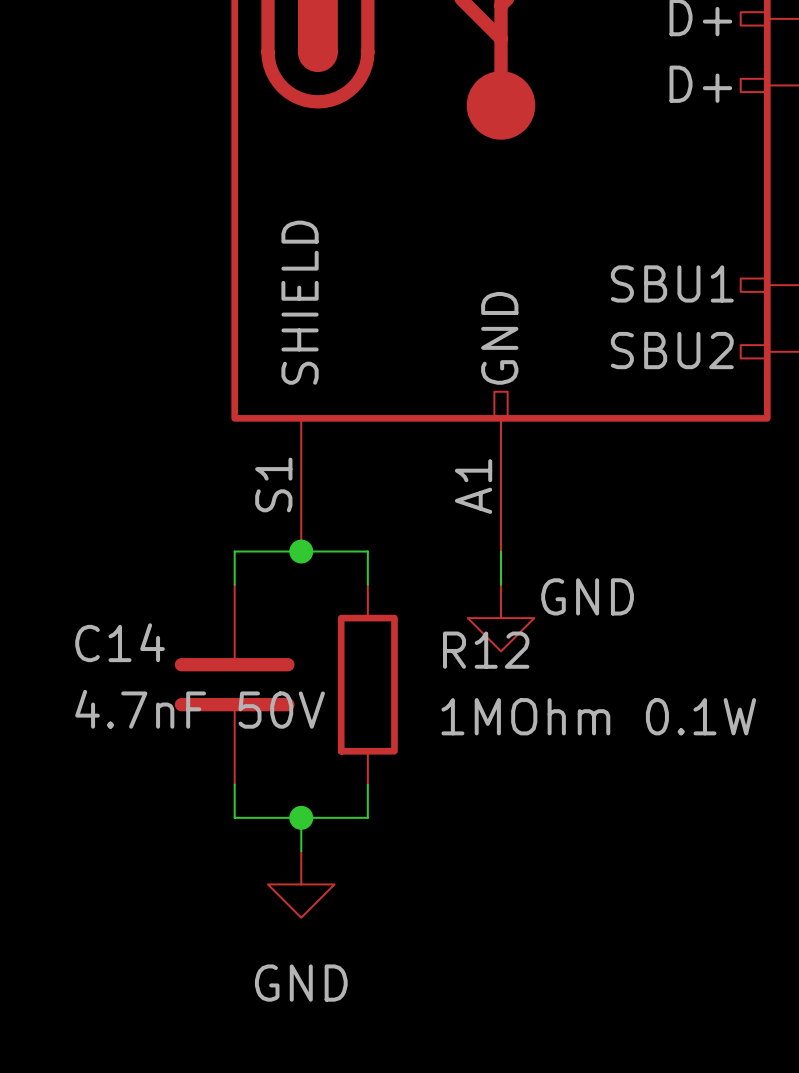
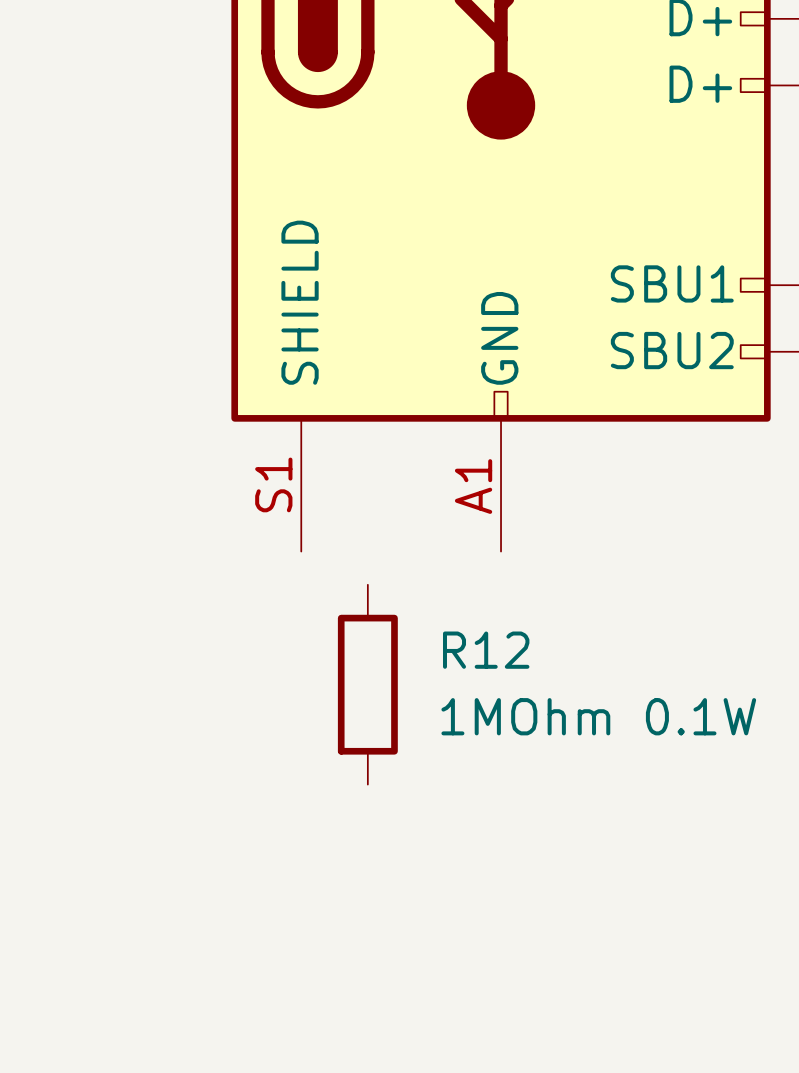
junction: (301, 551) -> none
wire: (501, 551) (501, 584) -> none
wire: (234, 584) (234, 551) (367, 551) (367, 584) -> none
power symbol: GND (501, 618) -> none
C14: 4.7nF 50V (234, 684) -> none
wire: (234, 784) (234, 817) (367, 817) (367, 784) -> none
wire: (301, 817) (301, 851) -> none
junction: (301, 817) -> none
power symbol: GND (301, 884) -> none

